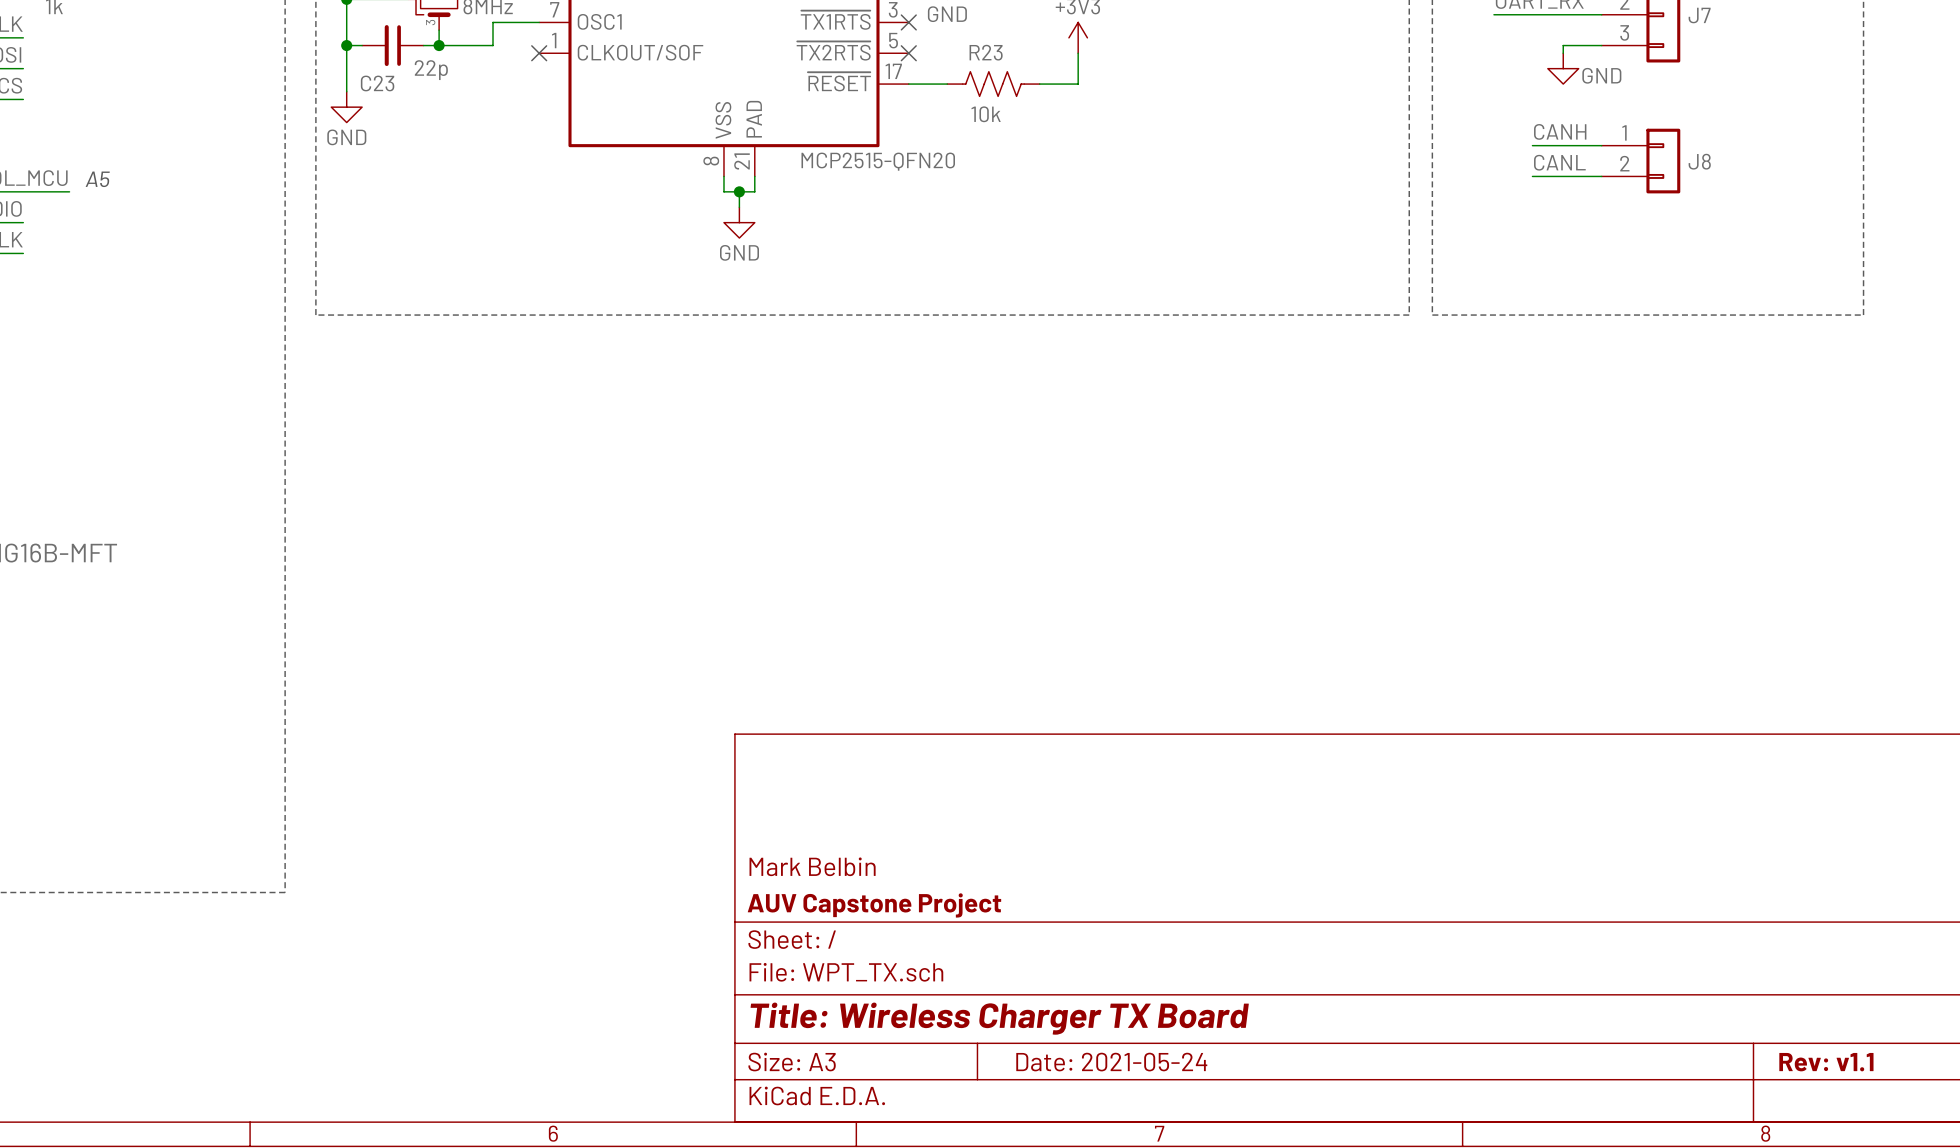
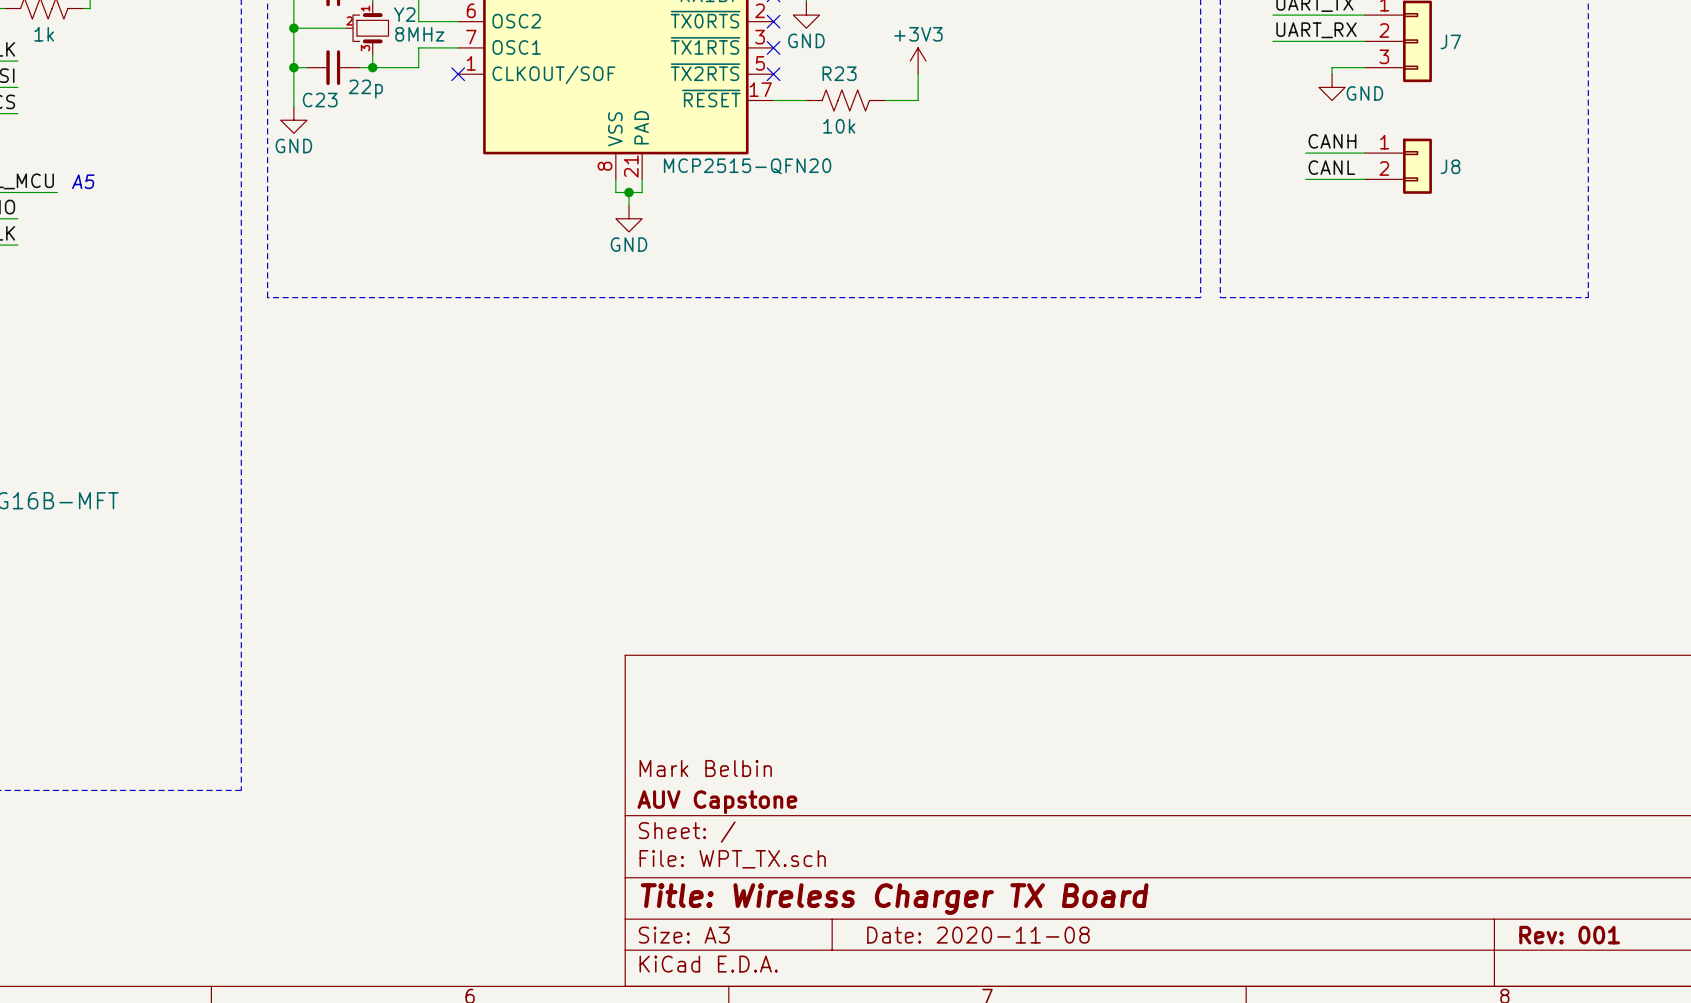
title block: AUV Capstone Project (874, 905) -> AUV Capstone (717, 802)
title block: Date: 2021-05-24 (1111, 1062) -> Date: 2020-11-08 (978, 935)
title block: Rev: v1.1 (1826, 1062) -> Rev: 001 (1569, 935)

